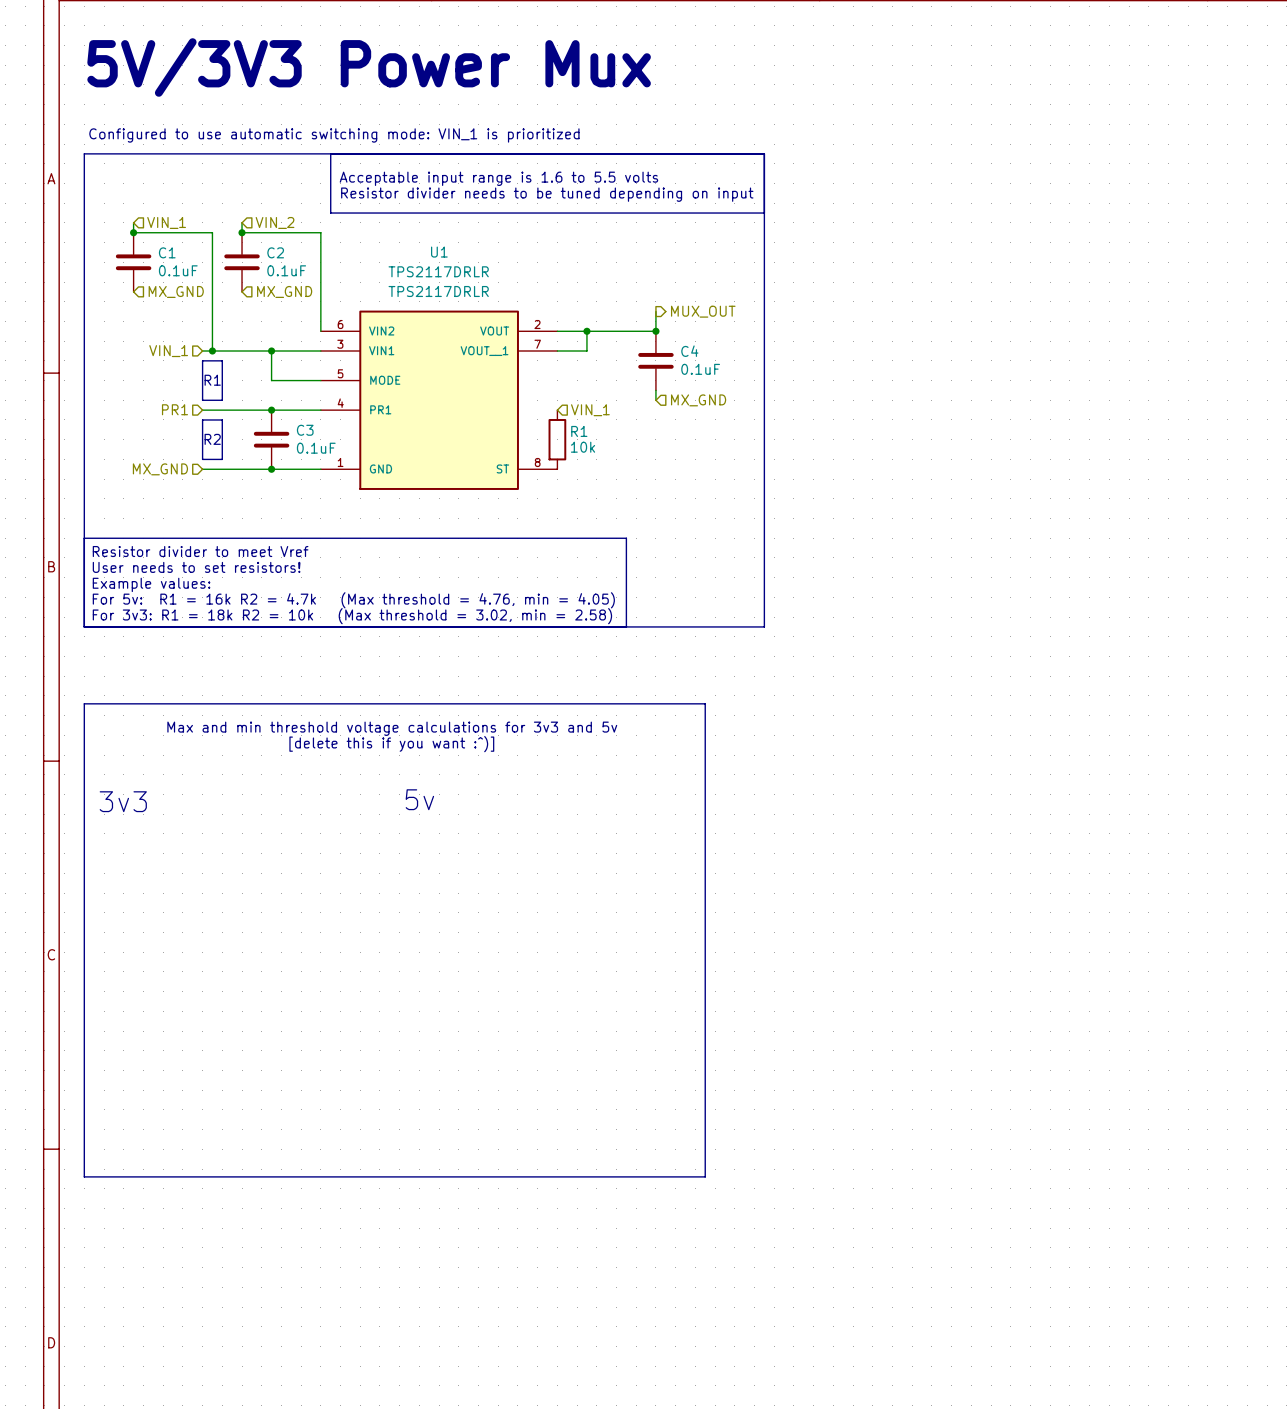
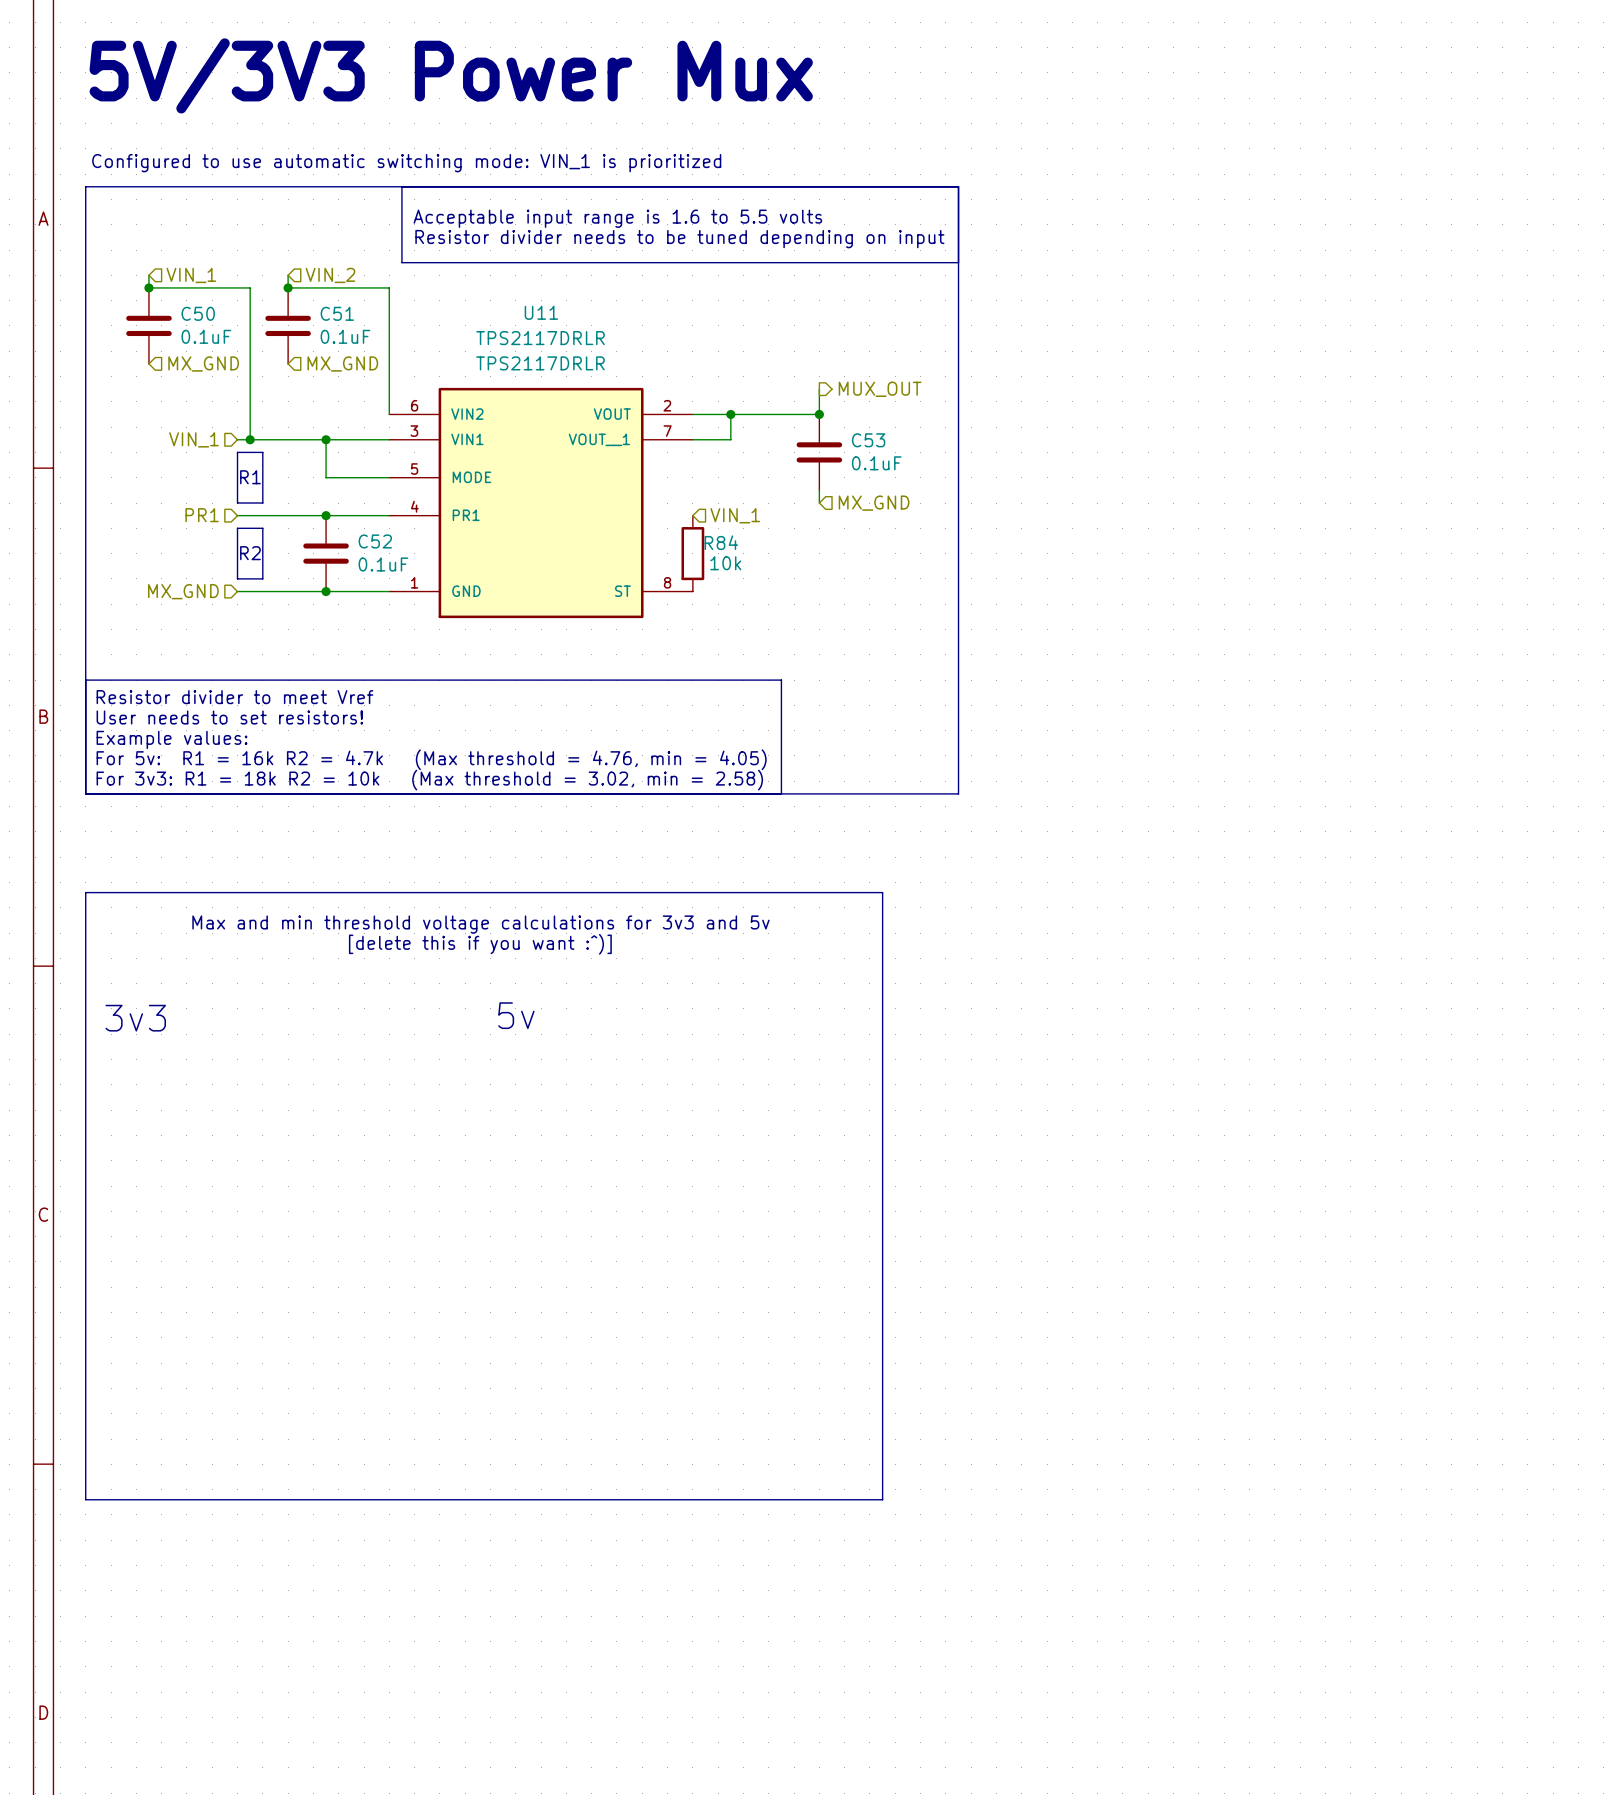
C1 name: C1 (167, 252) -> C50 (198, 313)
C2 name: C2 (275, 252) -> C51 (337, 313)
U1 name: U1 (439, 252) -> U11 (541, 312)
C4 name: C4 (689, 351) -> C53 (868, 440)
C3 name: C3 (305, 430) -> C52 (375, 541)
R1 name: R1 (579, 431) -> R84 (721, 542)

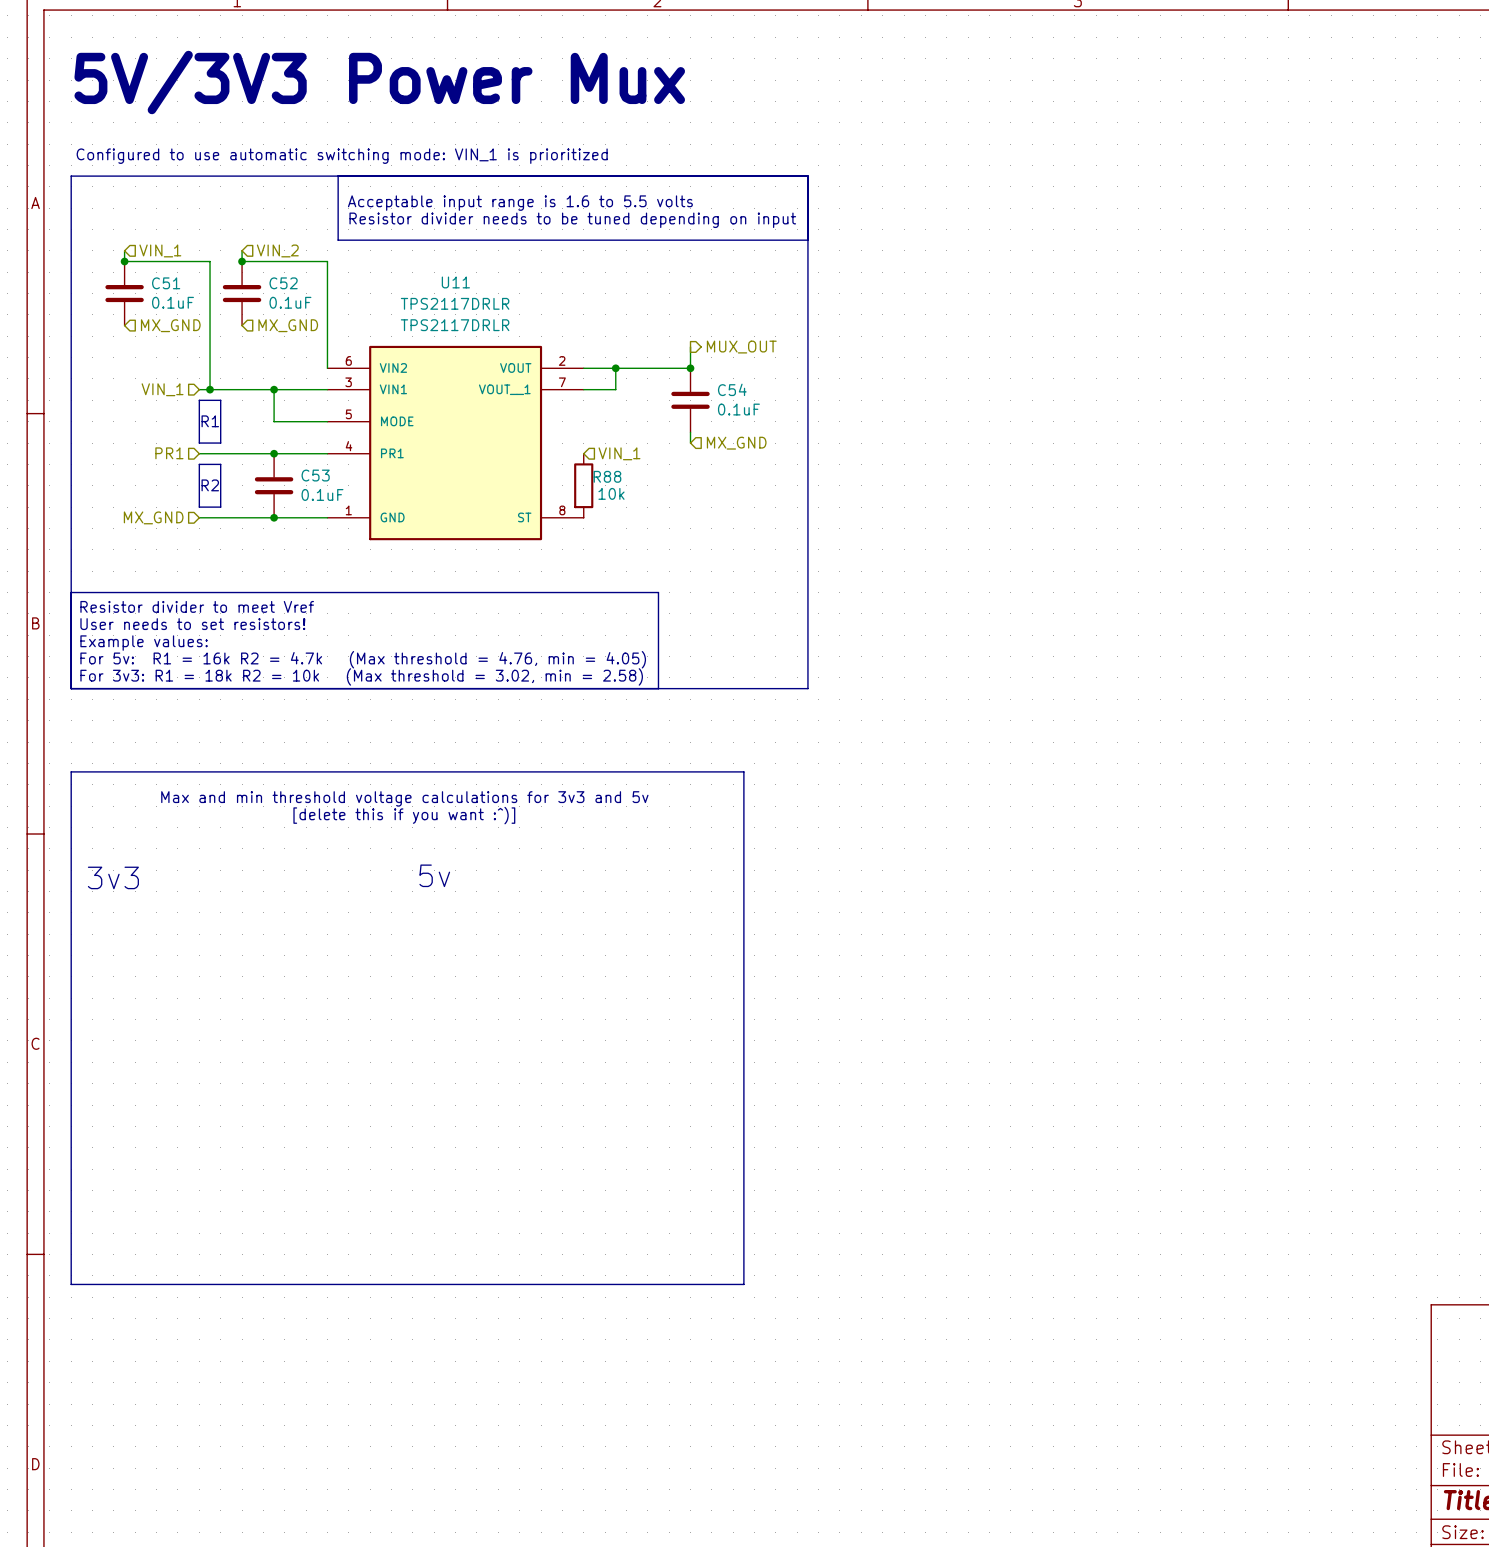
C50 name: C50 (198, 313) -> C51 (166, 283)
C51 name: C51 (337, 313) -> C52 (283, 283)
C53 name: C53 (868, 440) -> C54 (732, 389)
C52 name: C52 (375, 541) -> C53 (315, 475)
R84 name: R84 (721, 542) -> R88 (607, 476)

